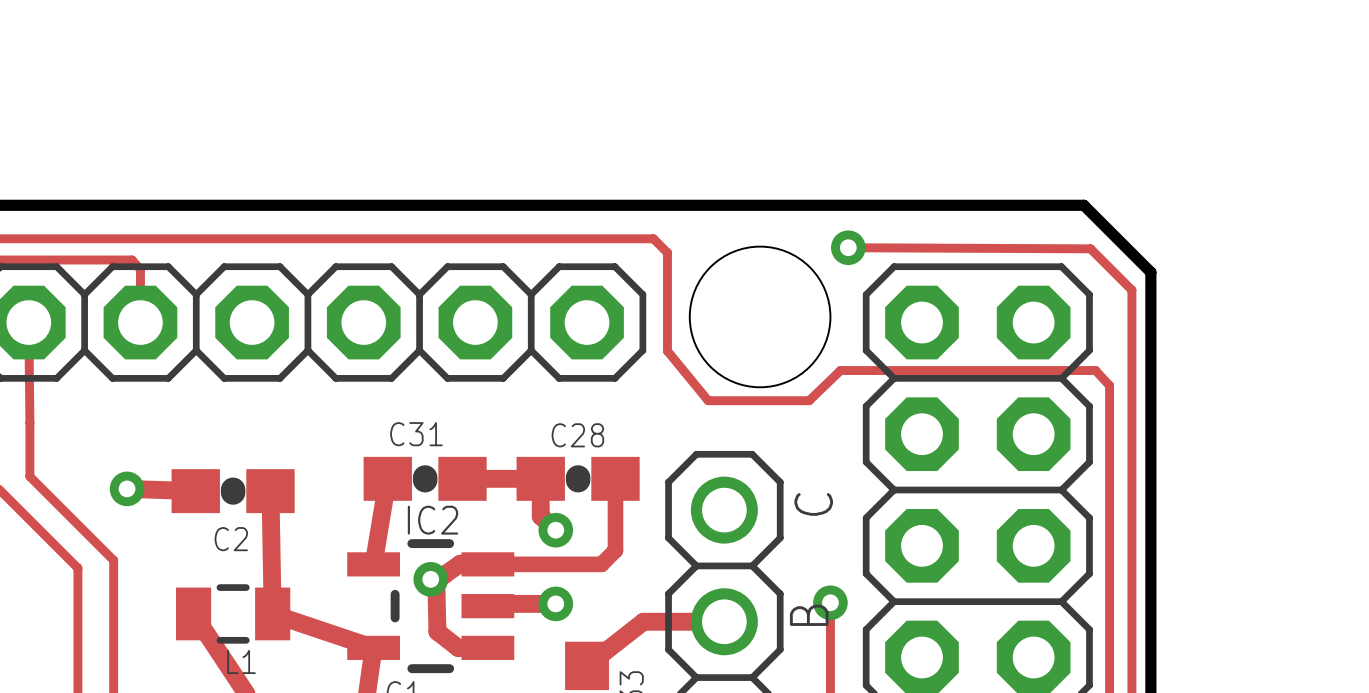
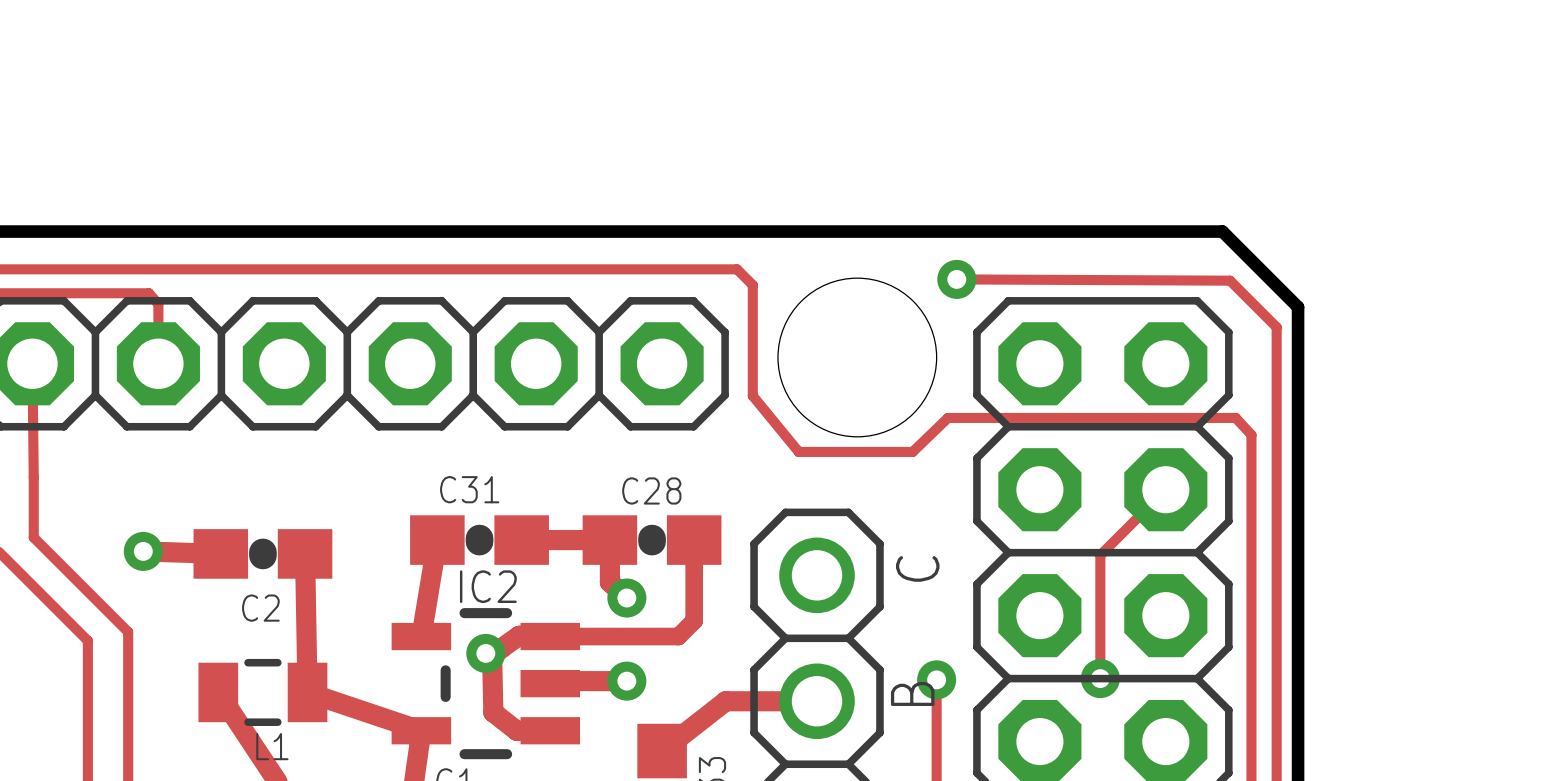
track: none -> (1165, 489) (1100, 555) (1100, 678)
via: none -> (1100, 678)

